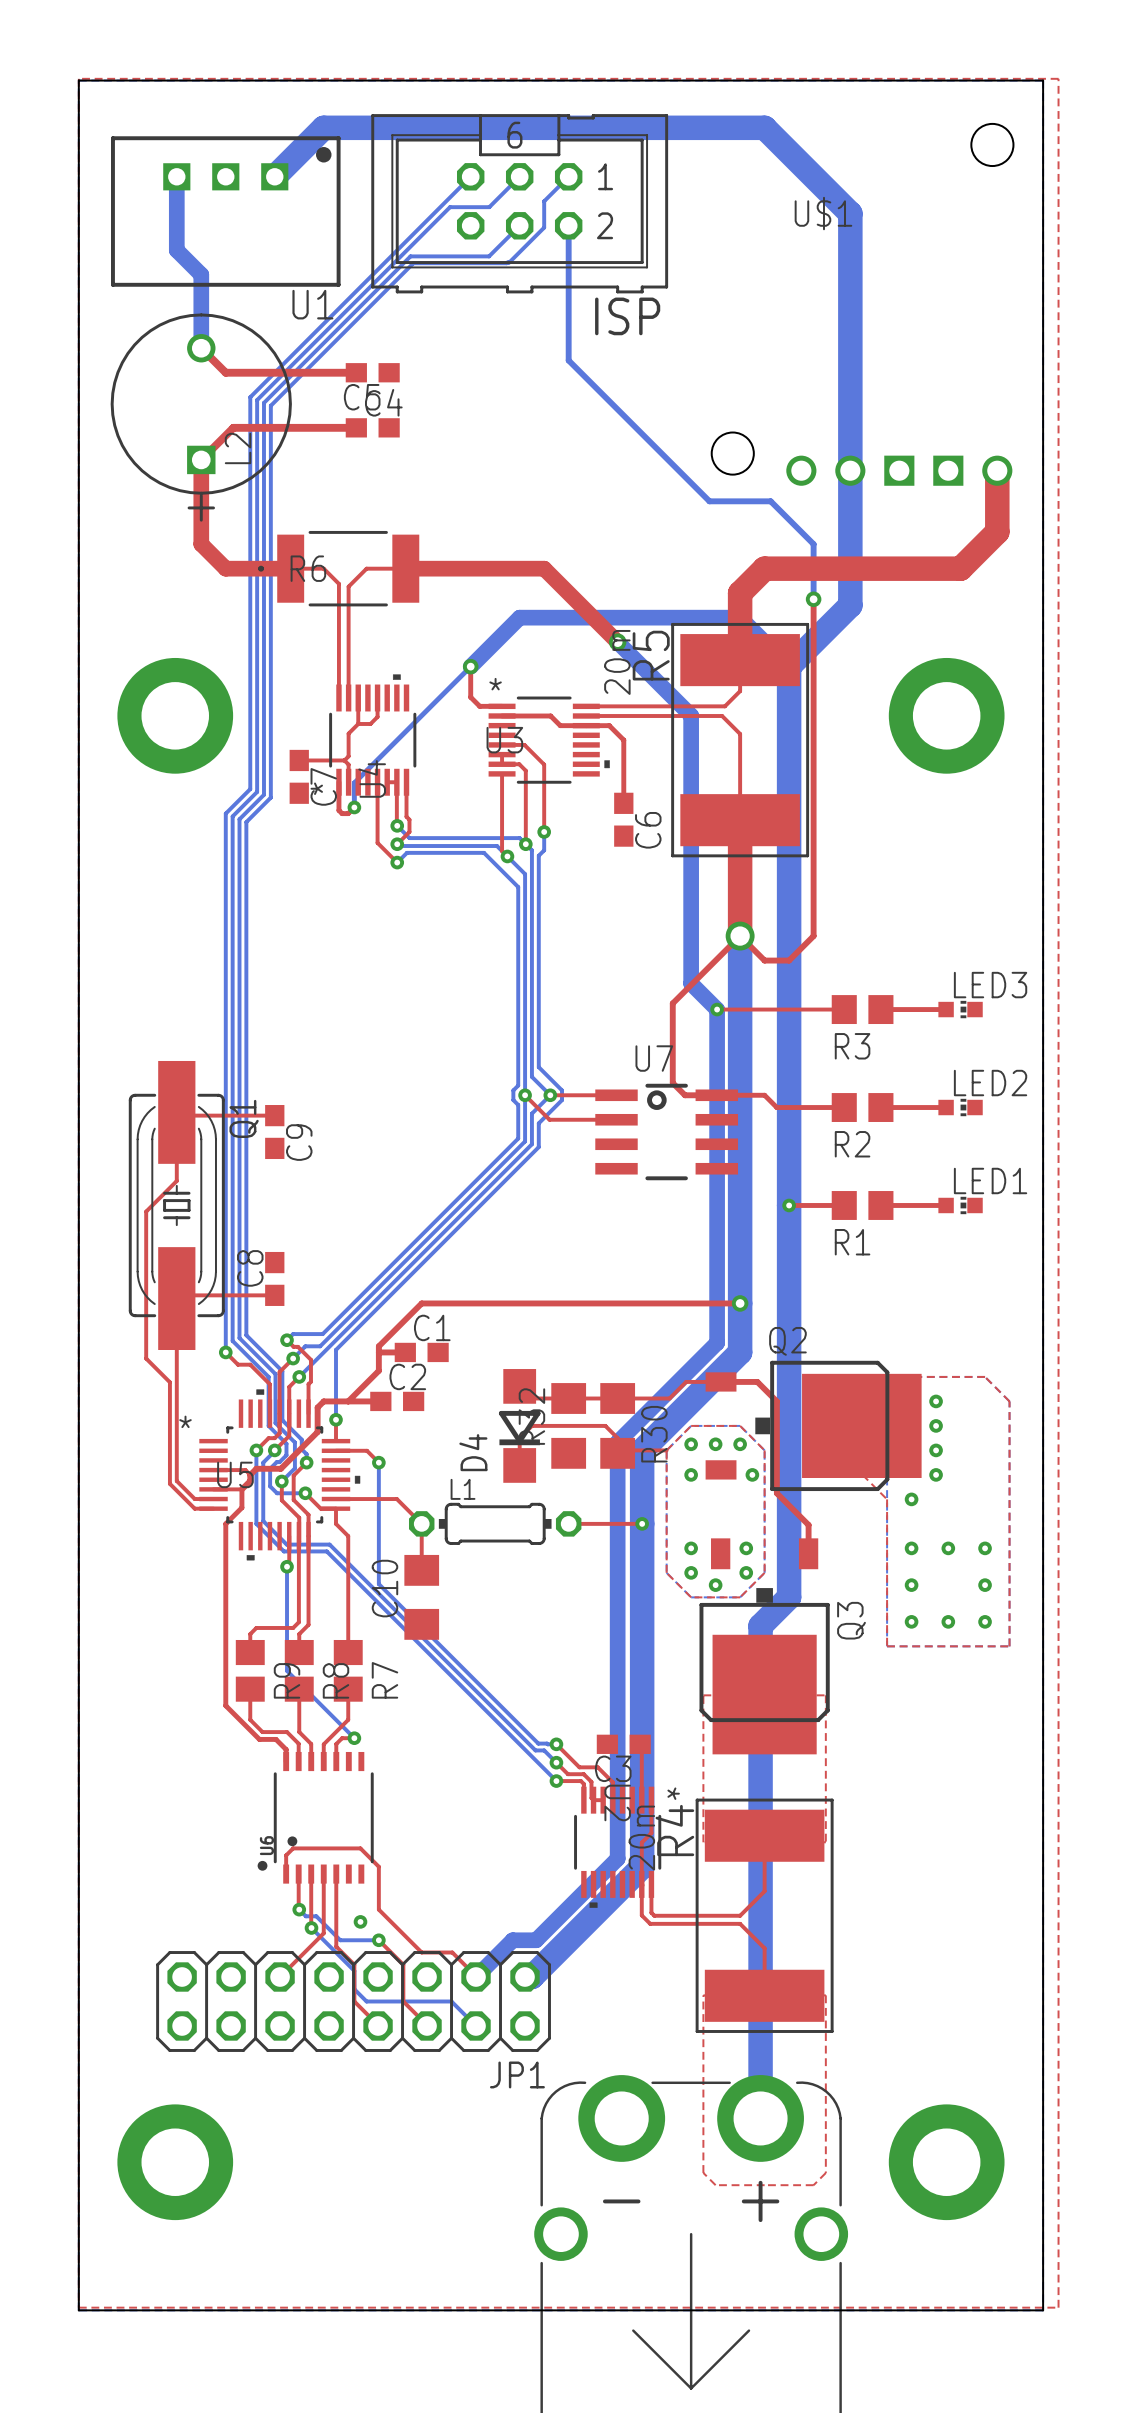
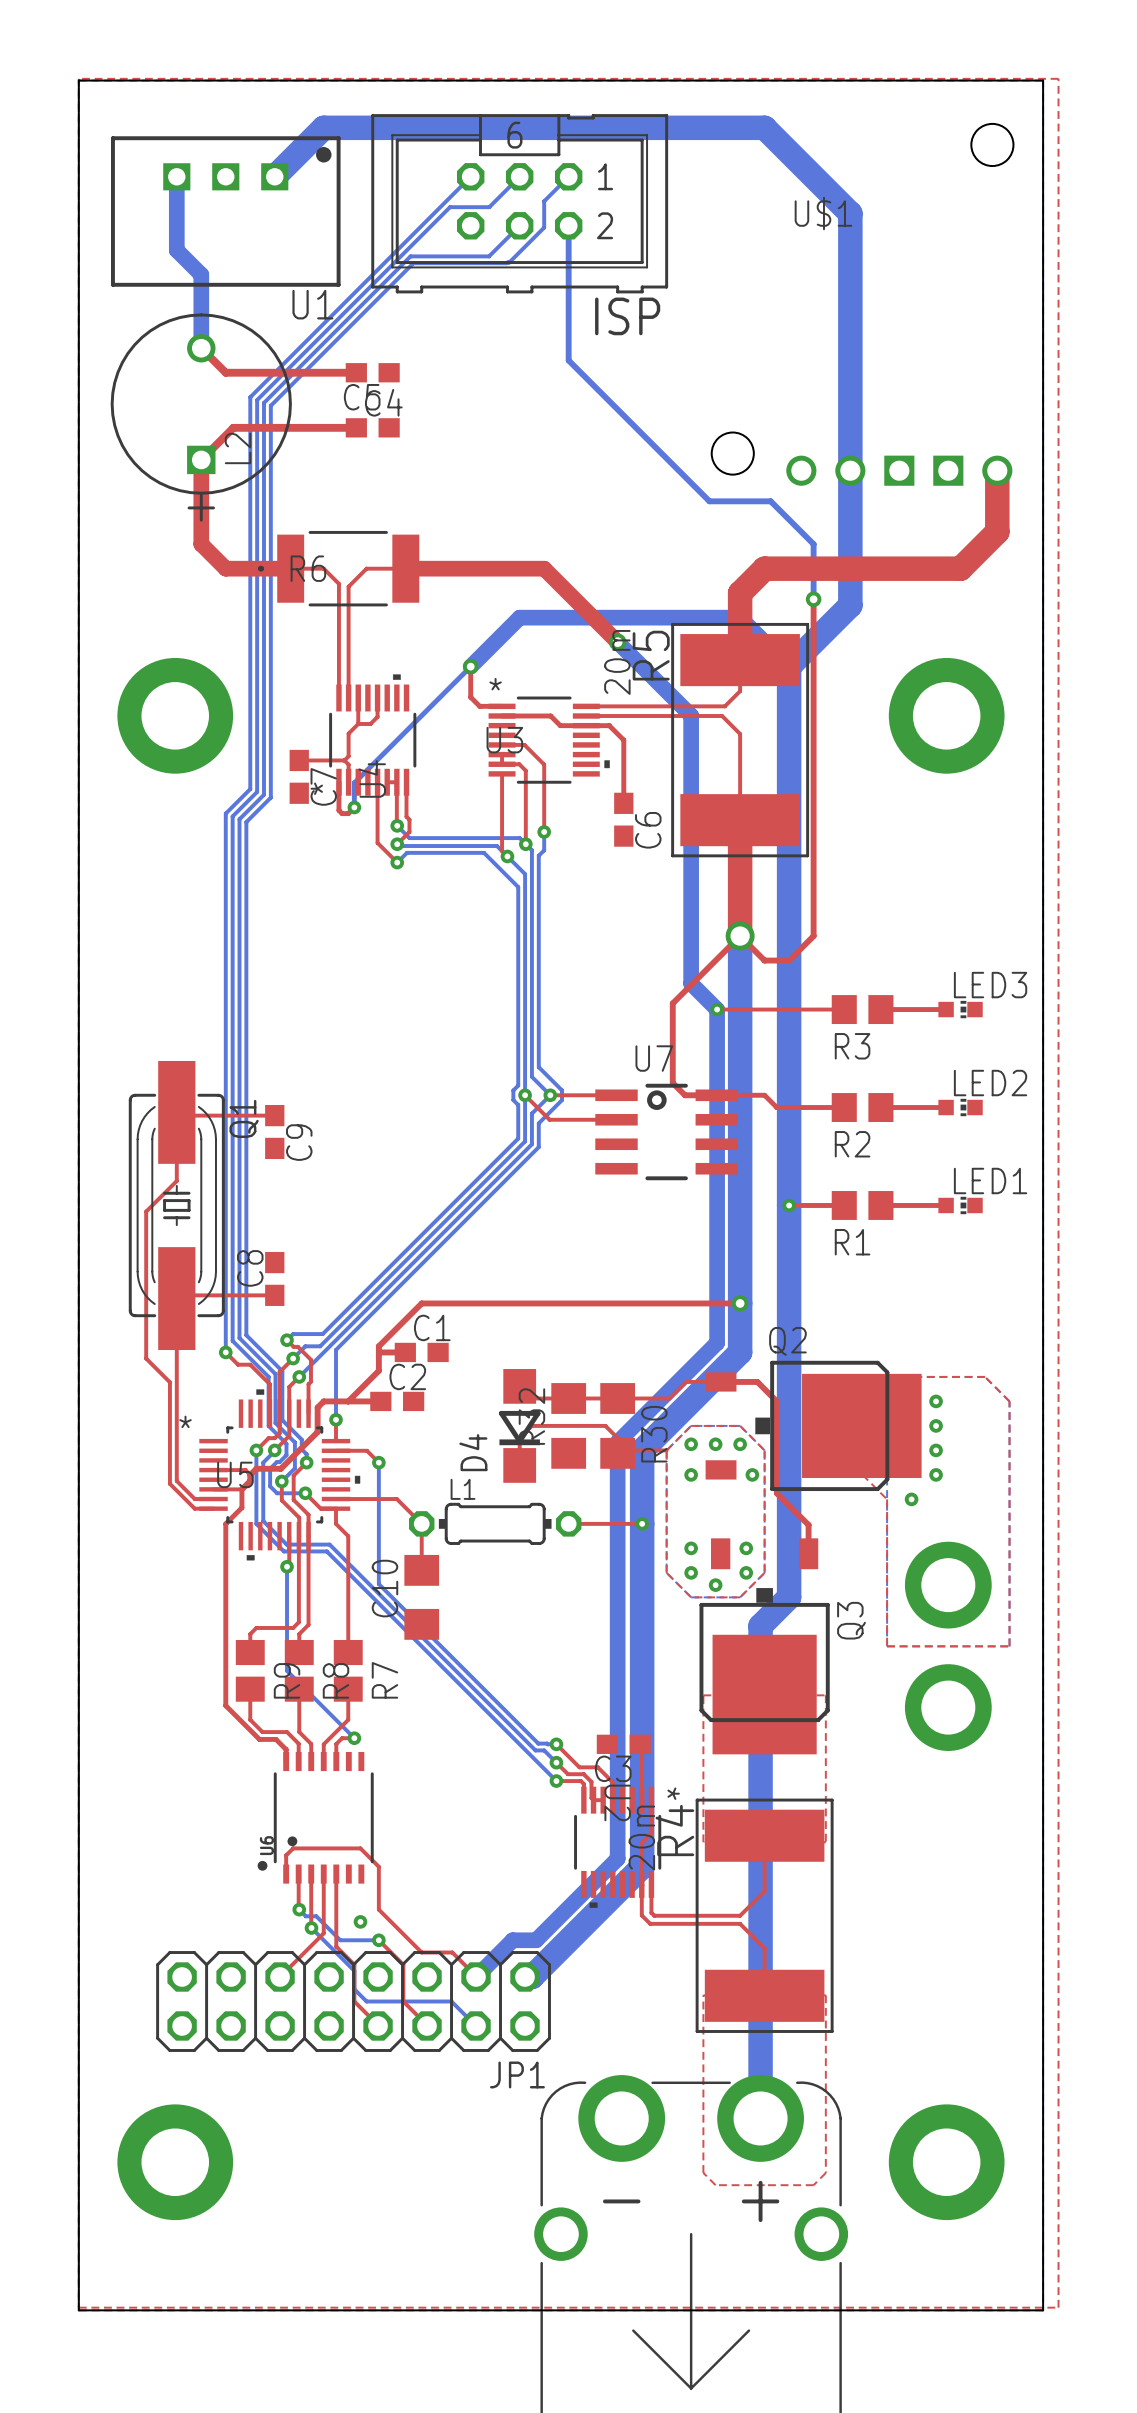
via: (911, 1548) -> none
via: (948, 1548) -> none
via: (985, 1548) -> none
via: (911, 1585) -> none
via: none -> (948, 1585)
via: (985, 1585) -> none
via: (911, 1621) -> none
via: (948, 1621) -> none
via: (985, 1621) -> none
via: none -> (948, 1707)

